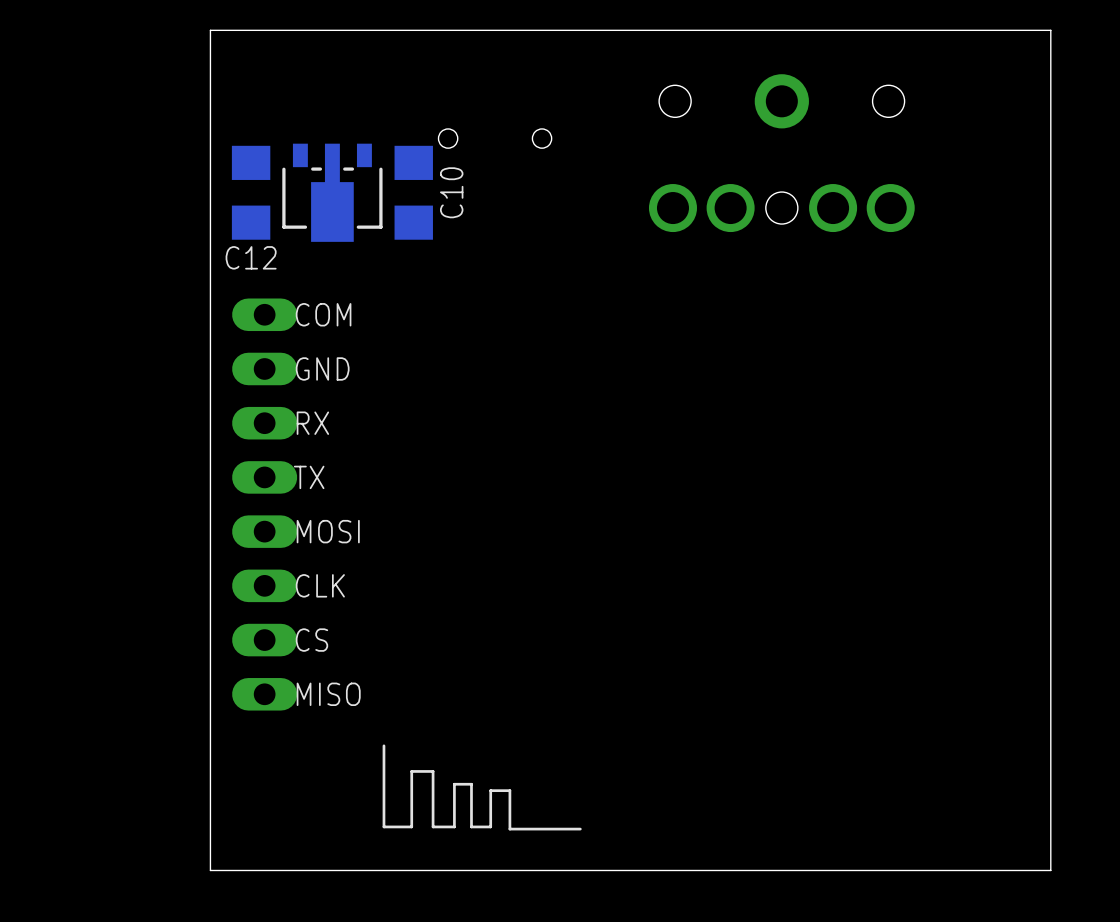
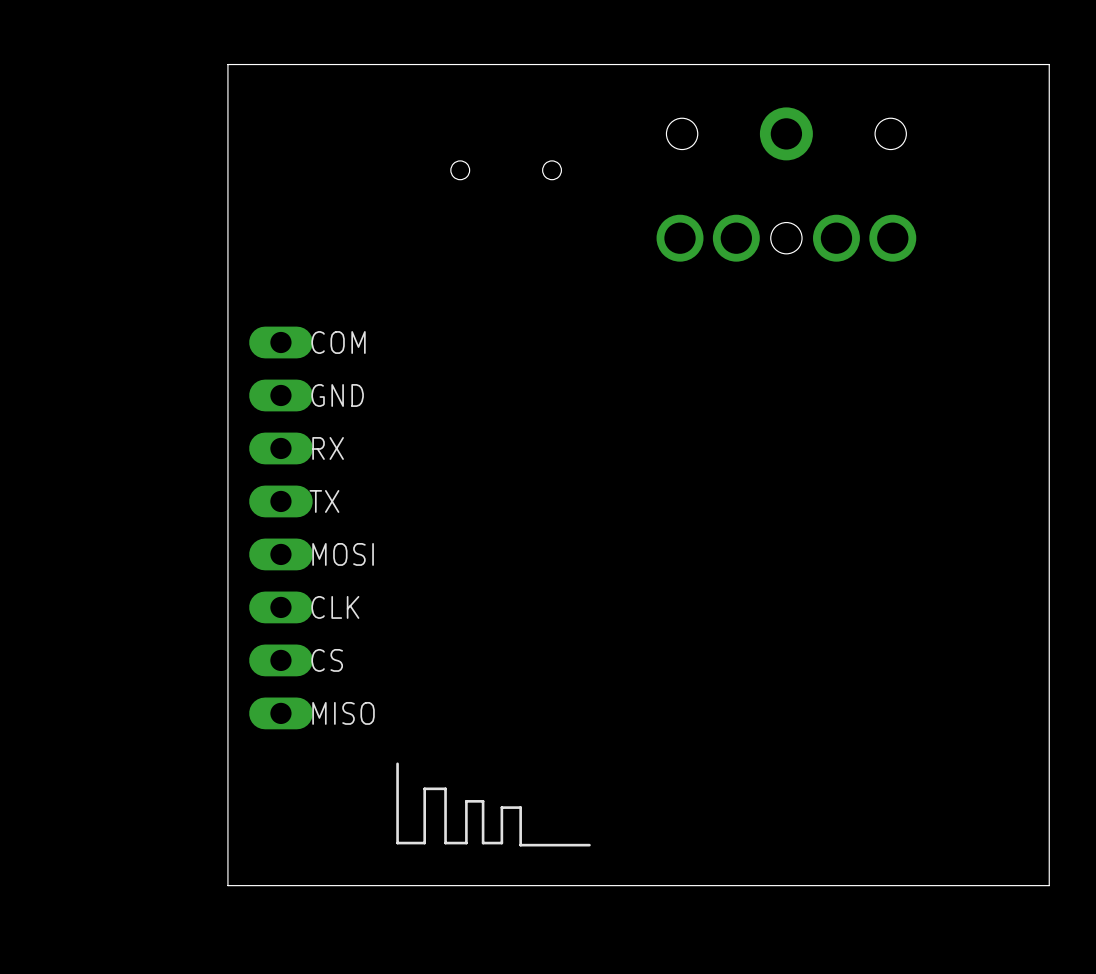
C12: (251, 192) -> none
part: (332, 192) -> none
C10: (413, 192) -> none

